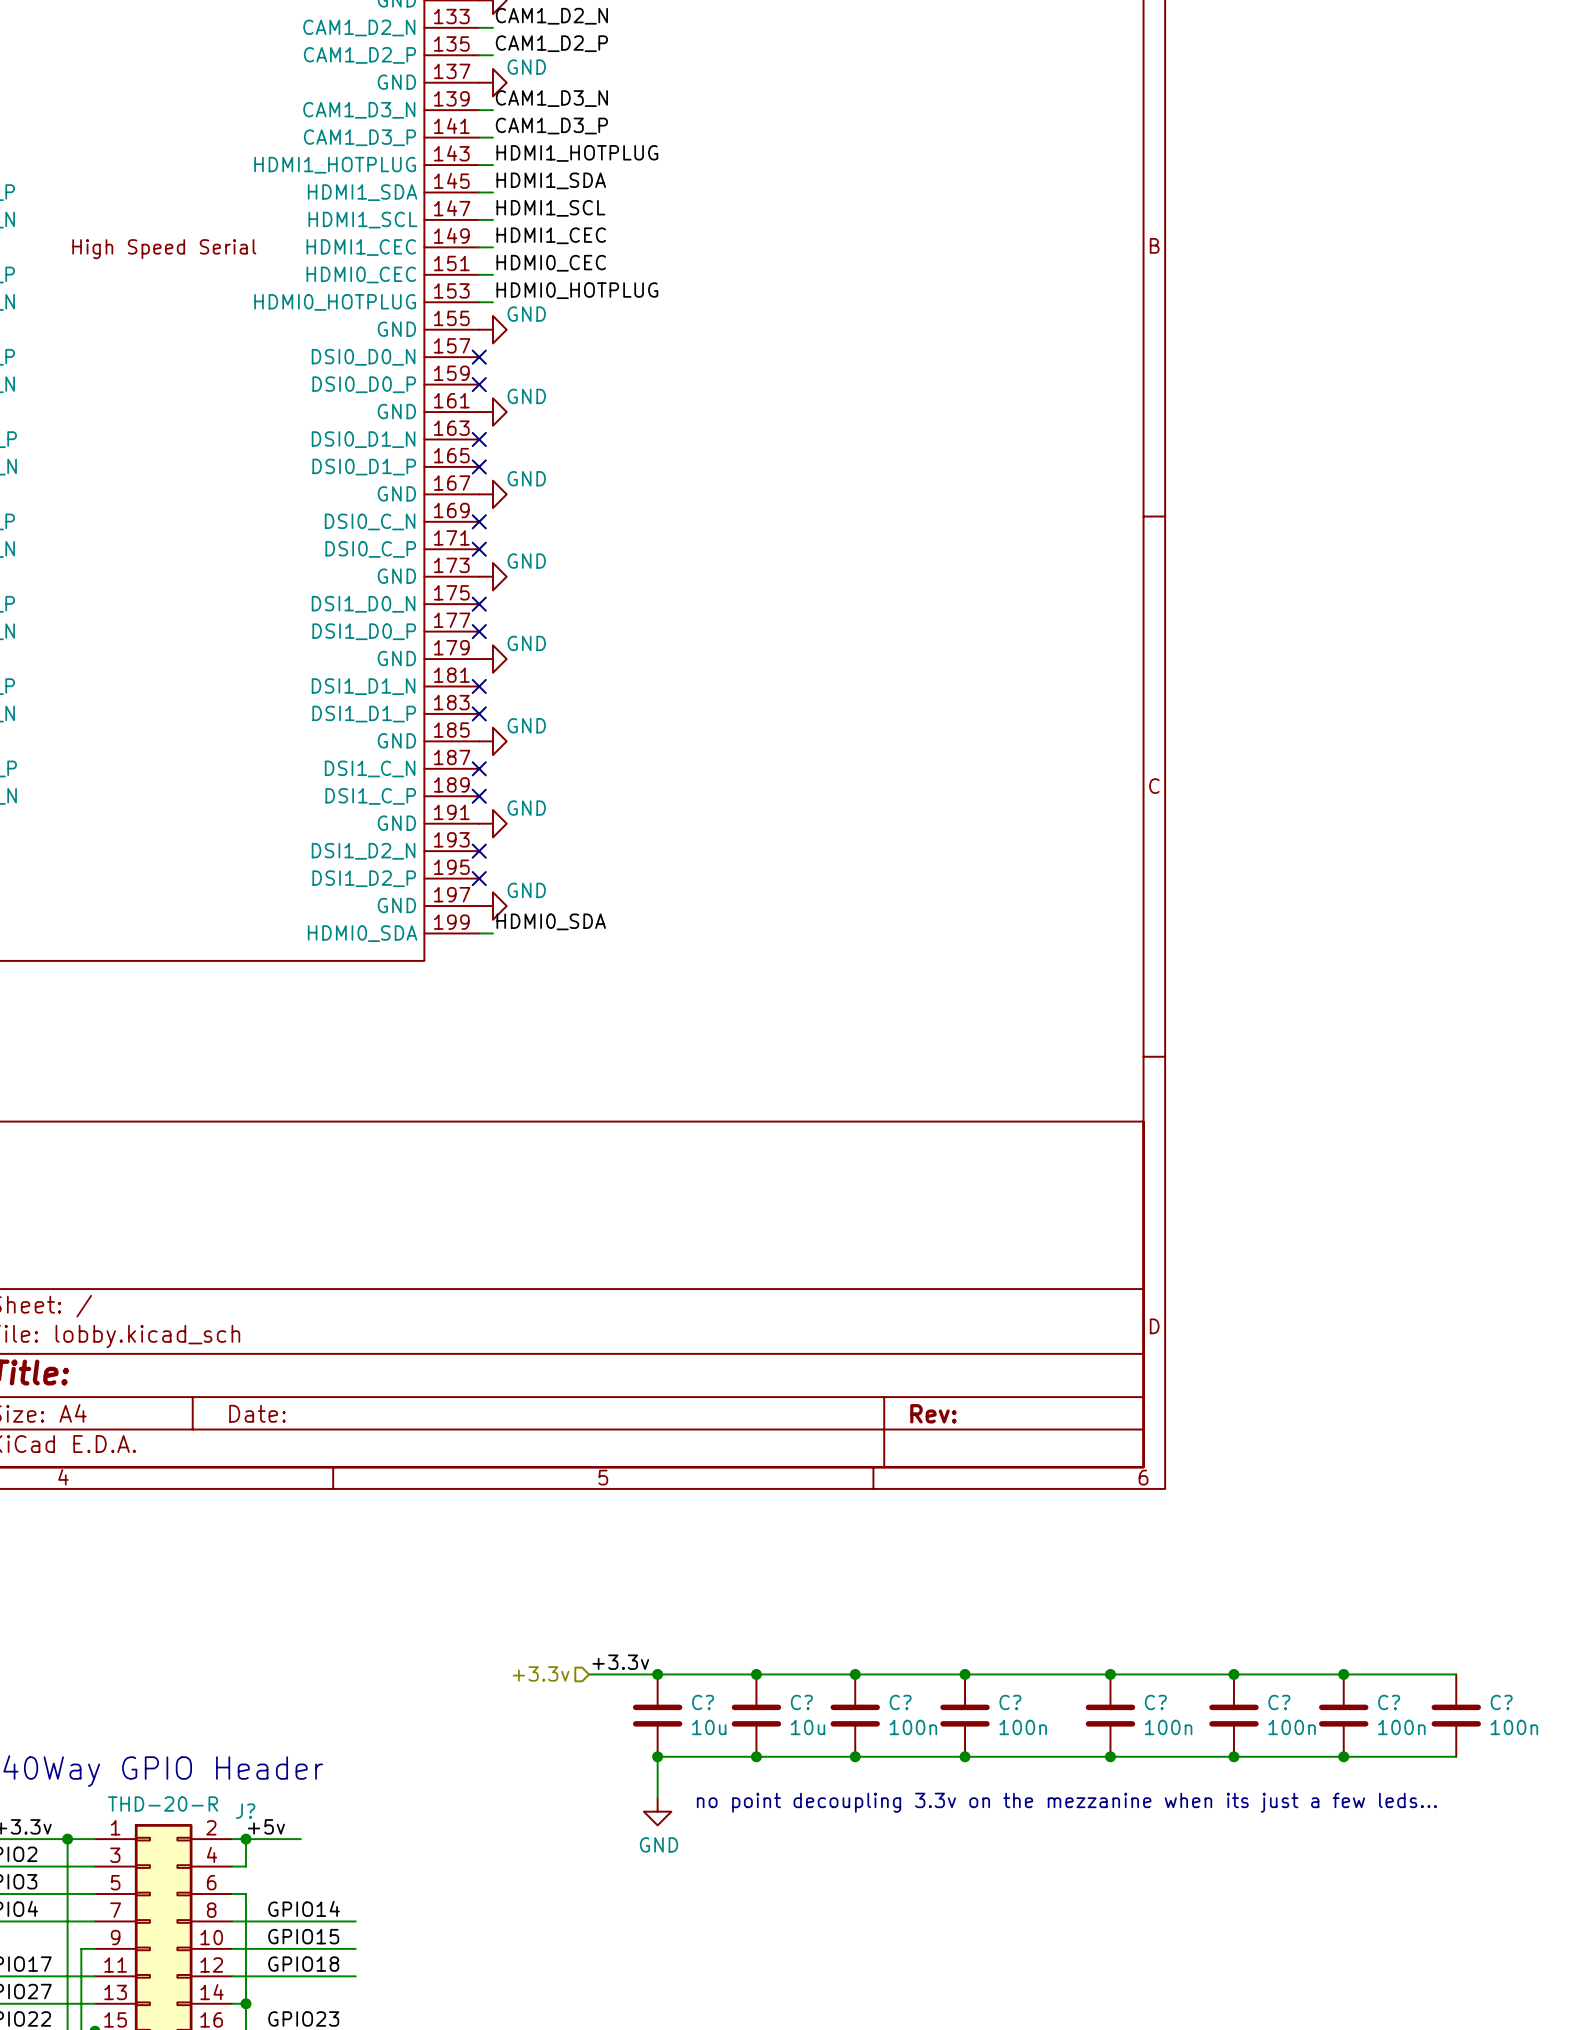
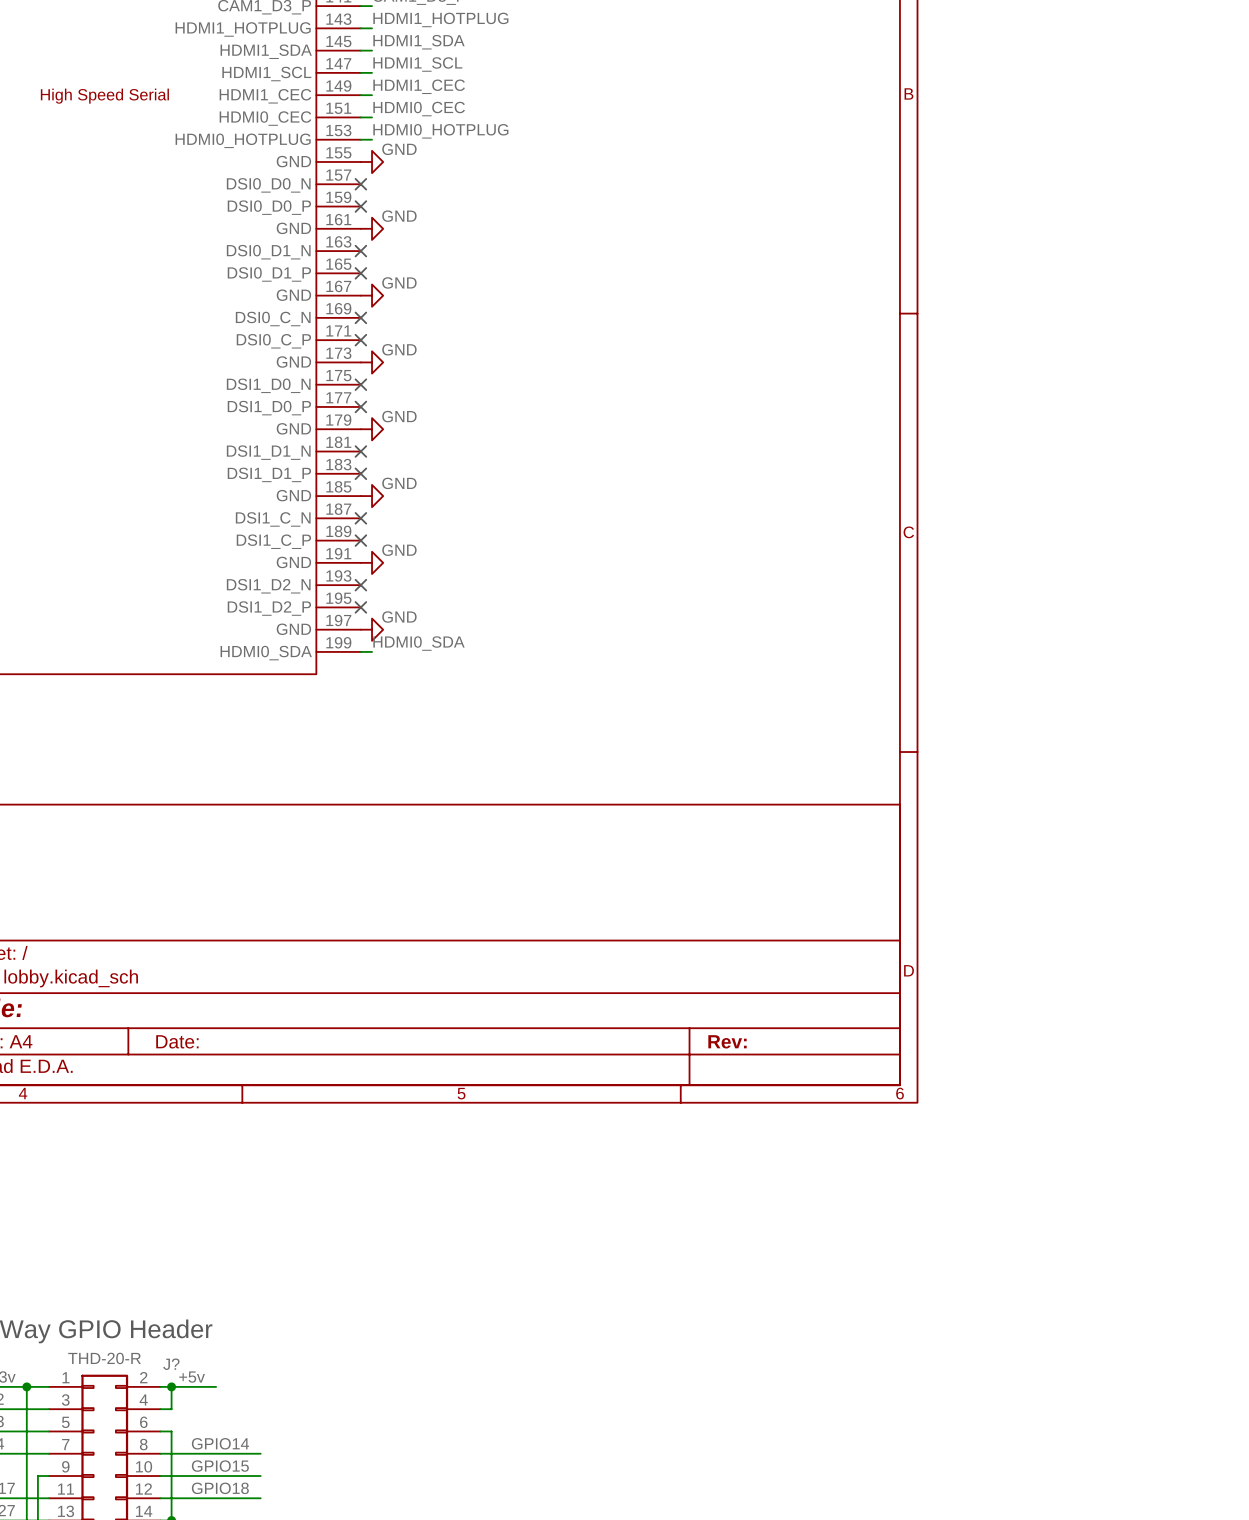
label: +3.3v (620, 1662) -> none
hierarchical label: +3.3v (541, 1673) -> none
wire: (589, 1674) (1456, 1674) -> none
junction: (657, 1674) -> none
junction: (756, 1674) -> none
junction: (855, 1674) -> none
junction: (965, 1674) -> none
junction: (1110, 1674) -> none
junction: (1233, 1674) -> none
junction: (1343, 1674) -> none
C?: 10u (657, 1715) -> none
C?: 10u (756, 1715) -> none
C?: 100n (855, 1715) -> none
C?: 100n (965, 1715) -> none
C?: 100n (1110, 1715) -> none
C?: 100n (1233, 1715) -> none
C?: 100n (1343, 1715) -> none
C?: 100n (1456, 1715) -> none
junction: (657, 1756) -> none
junction: (756, 1756) -> none
junction: (855, 1756) -> none
junction: (965, 1756) -> none
junction: (1110, 1756) -> none
junction: (1233, 1756) -> none
junction: (1343, 1756) -> none
wire: (1456, 1756) (657, 1756) (657, 1797) -> none
text: no point decoupling 3.3v on the mezzanine when its just a few leds... (1066, 1802) -> none
power symbol: GND (657, 1811) -> none

